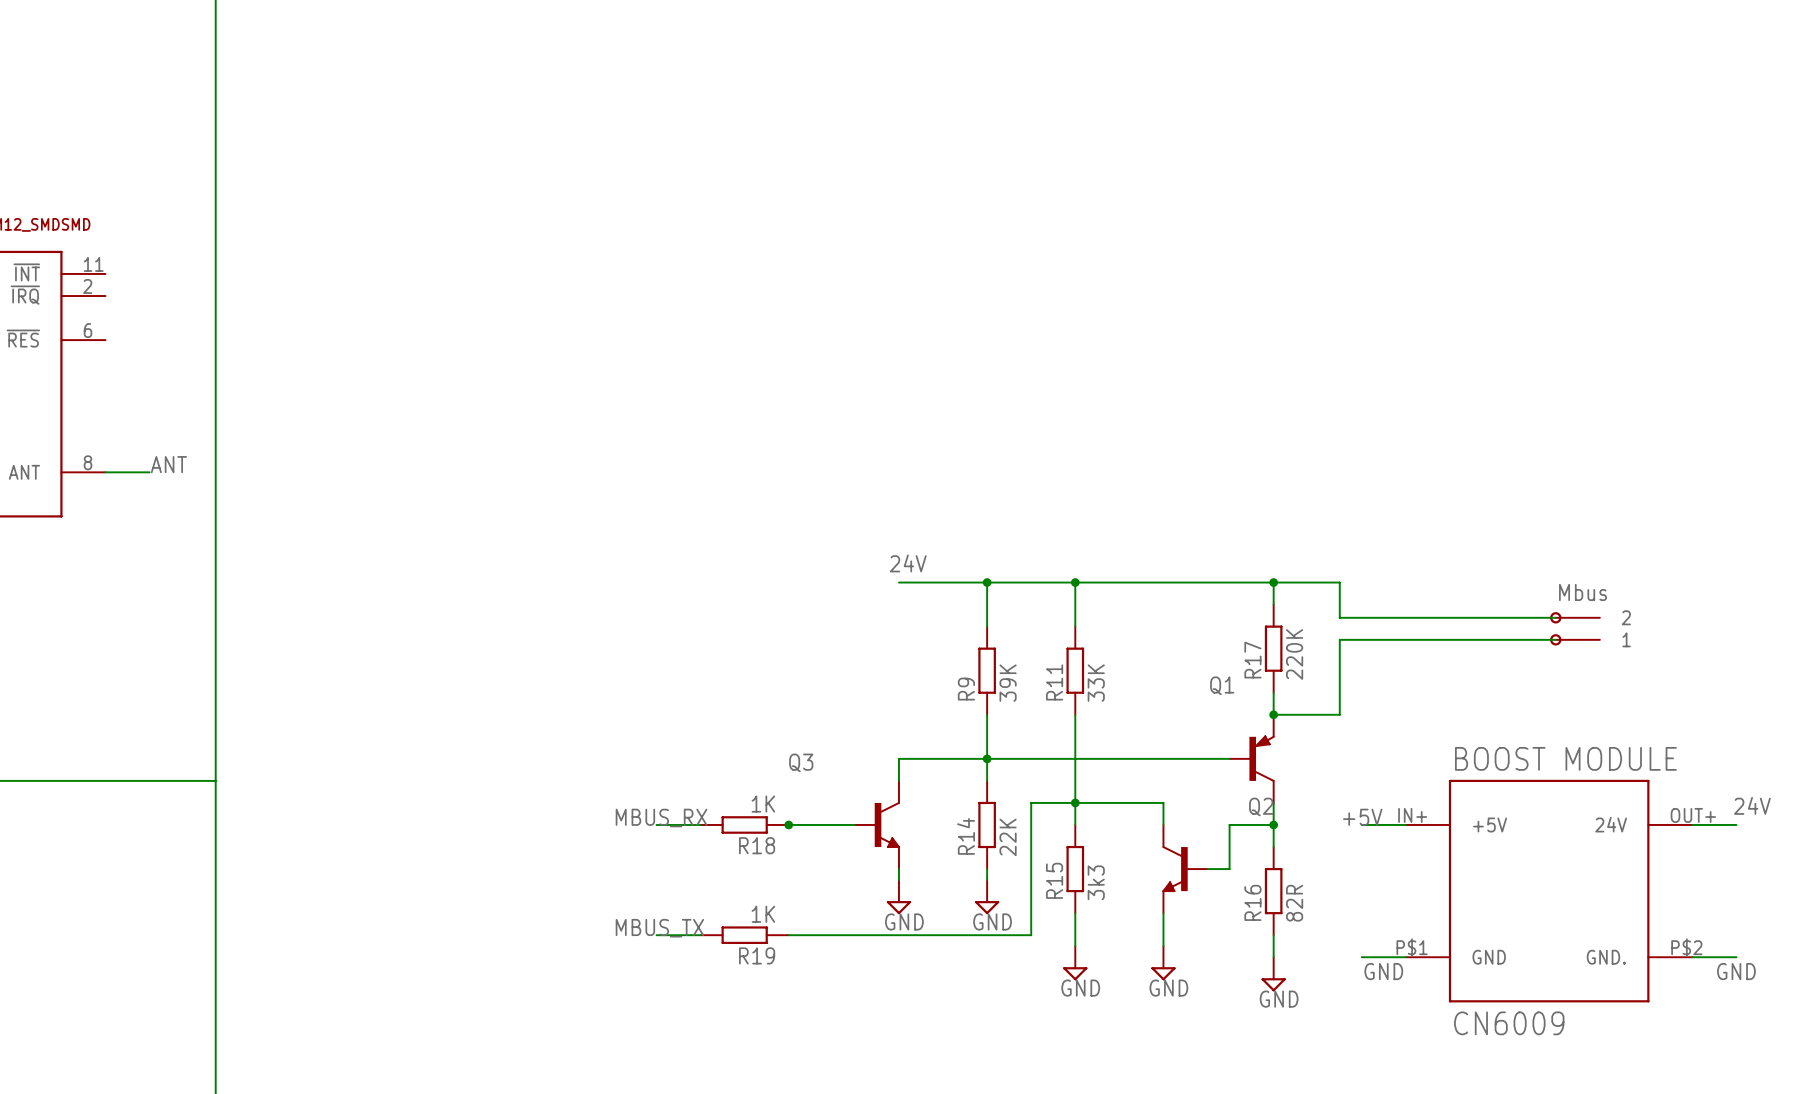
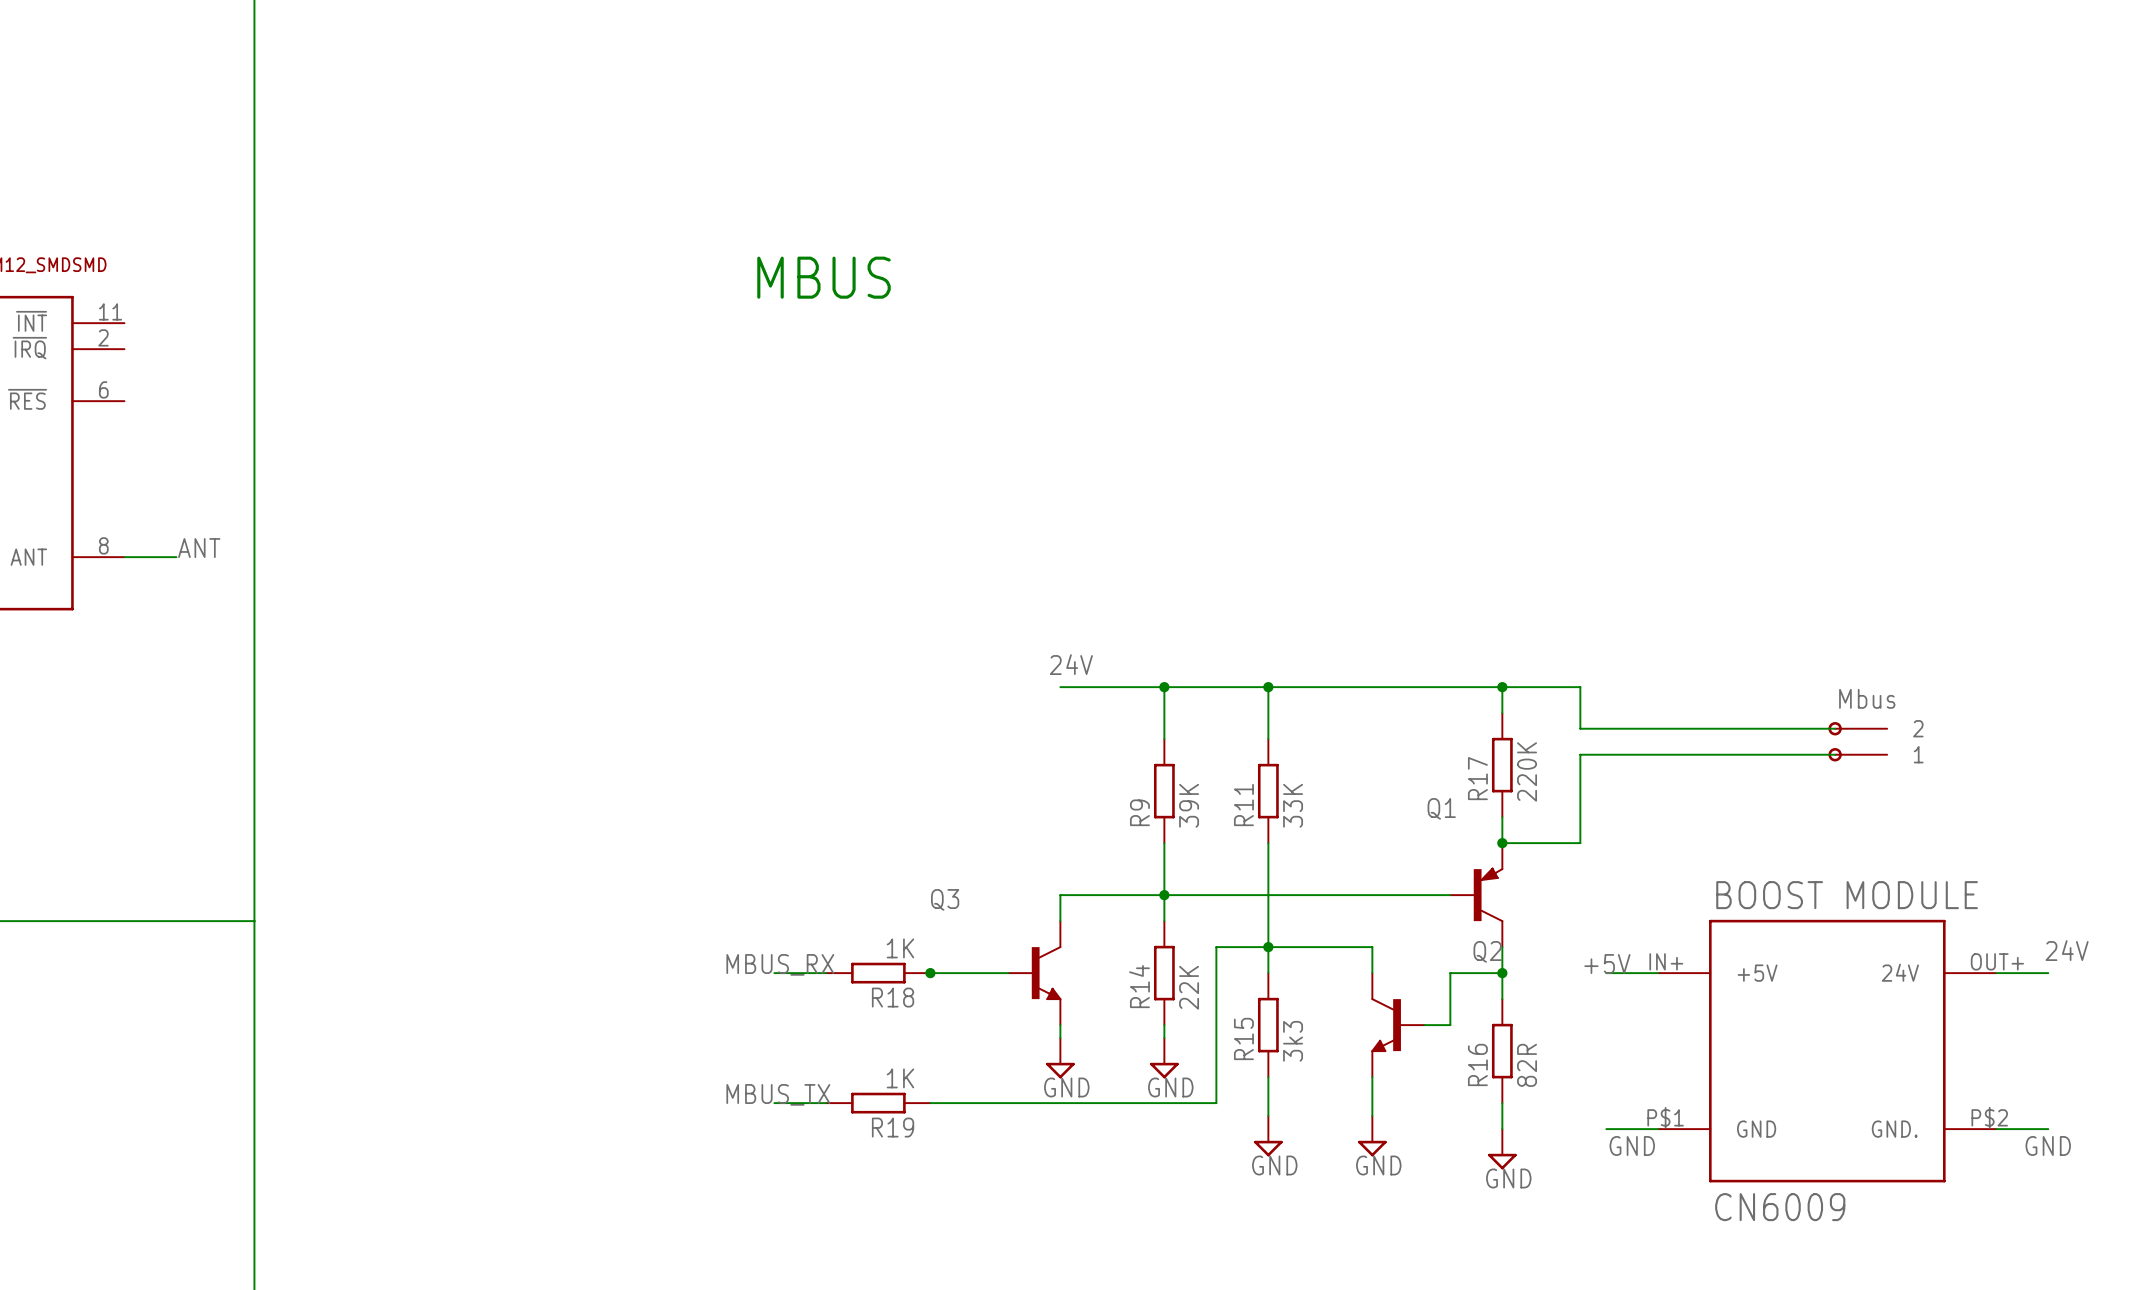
text: none -> MBUS (823, 277)

